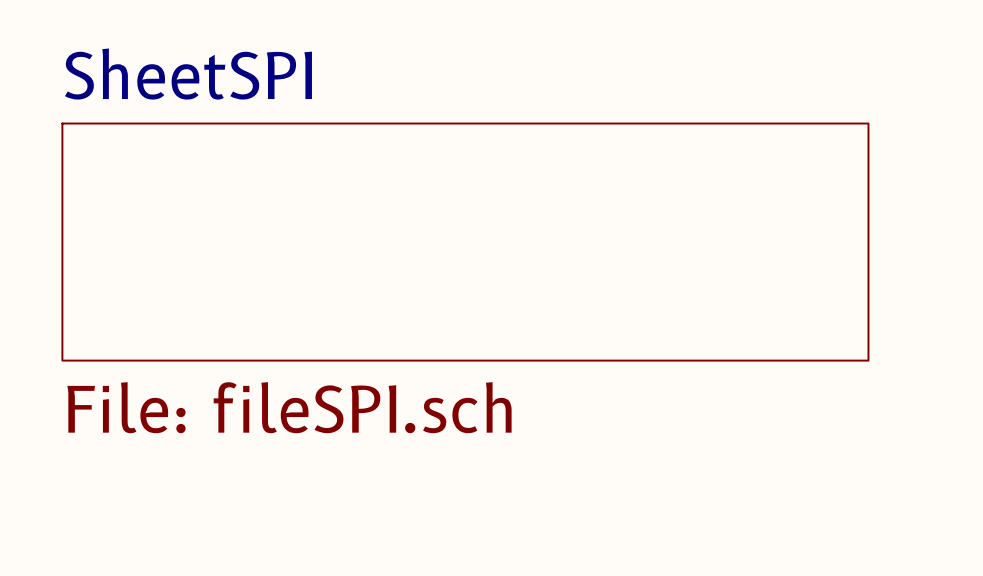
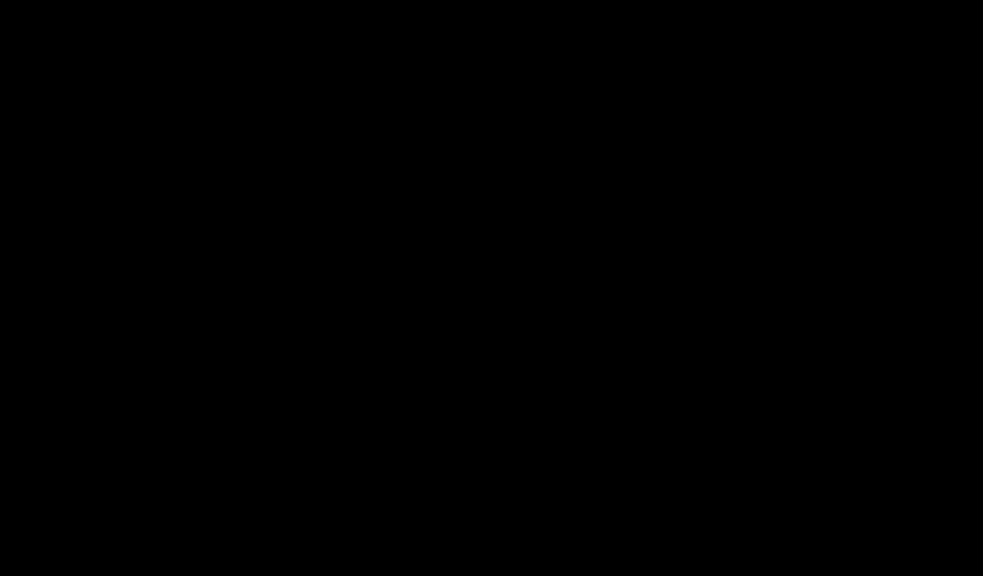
sheet SheetSPI: File: fileSPI.sch (465, 242) -> none

